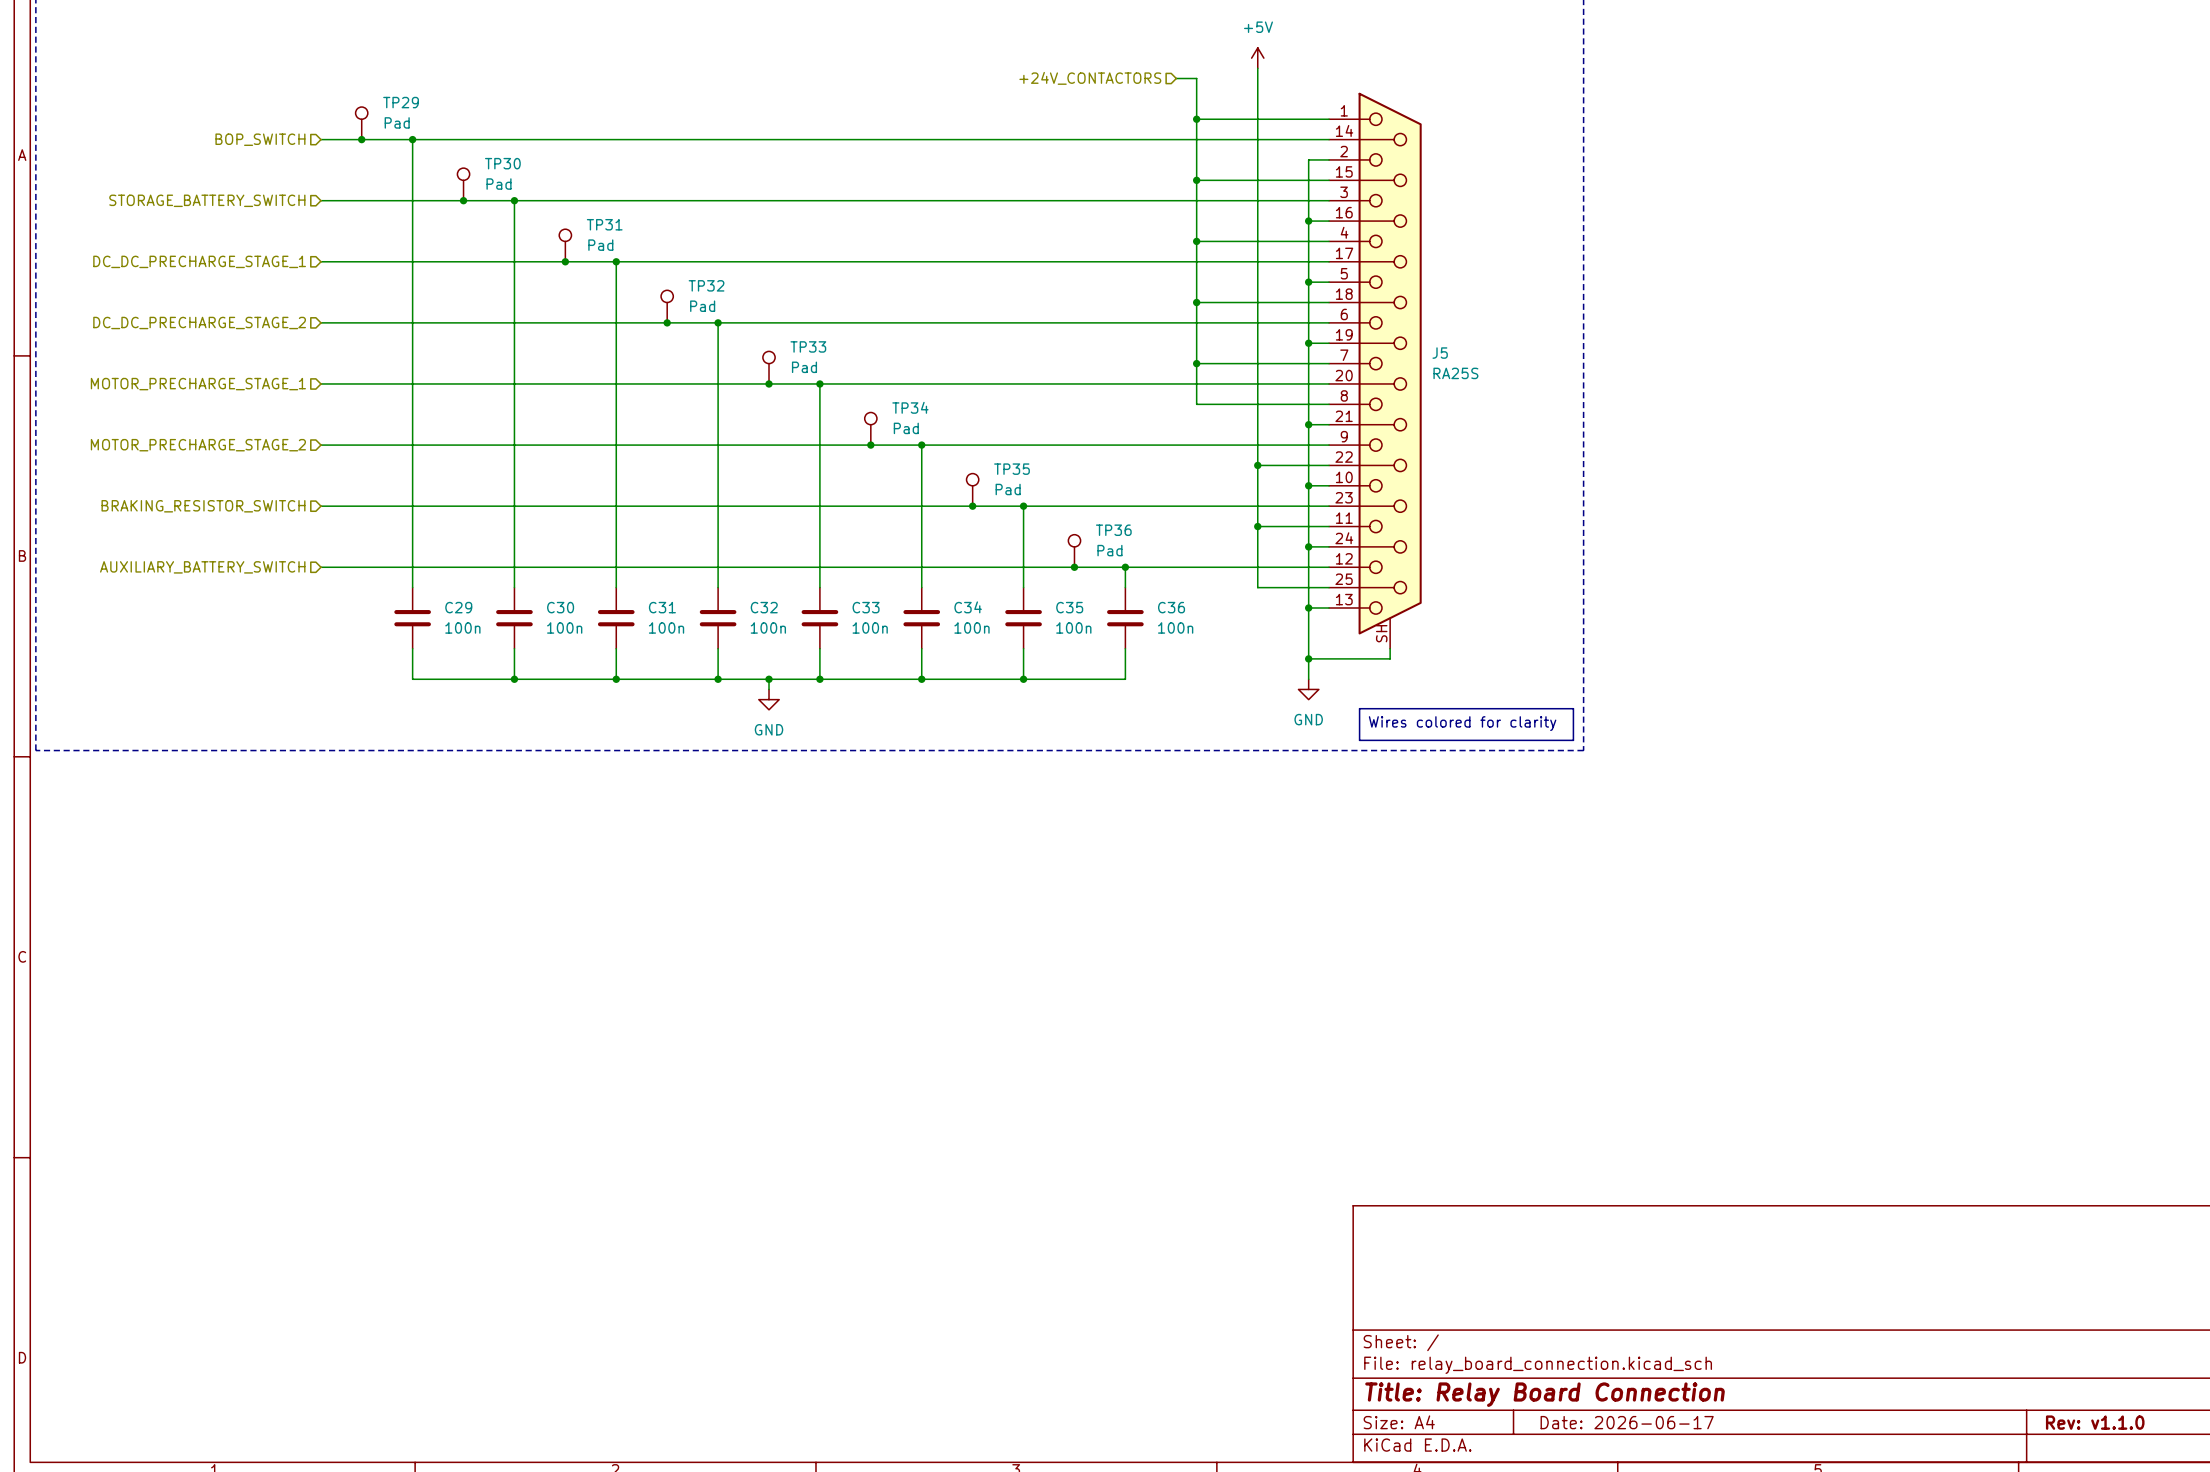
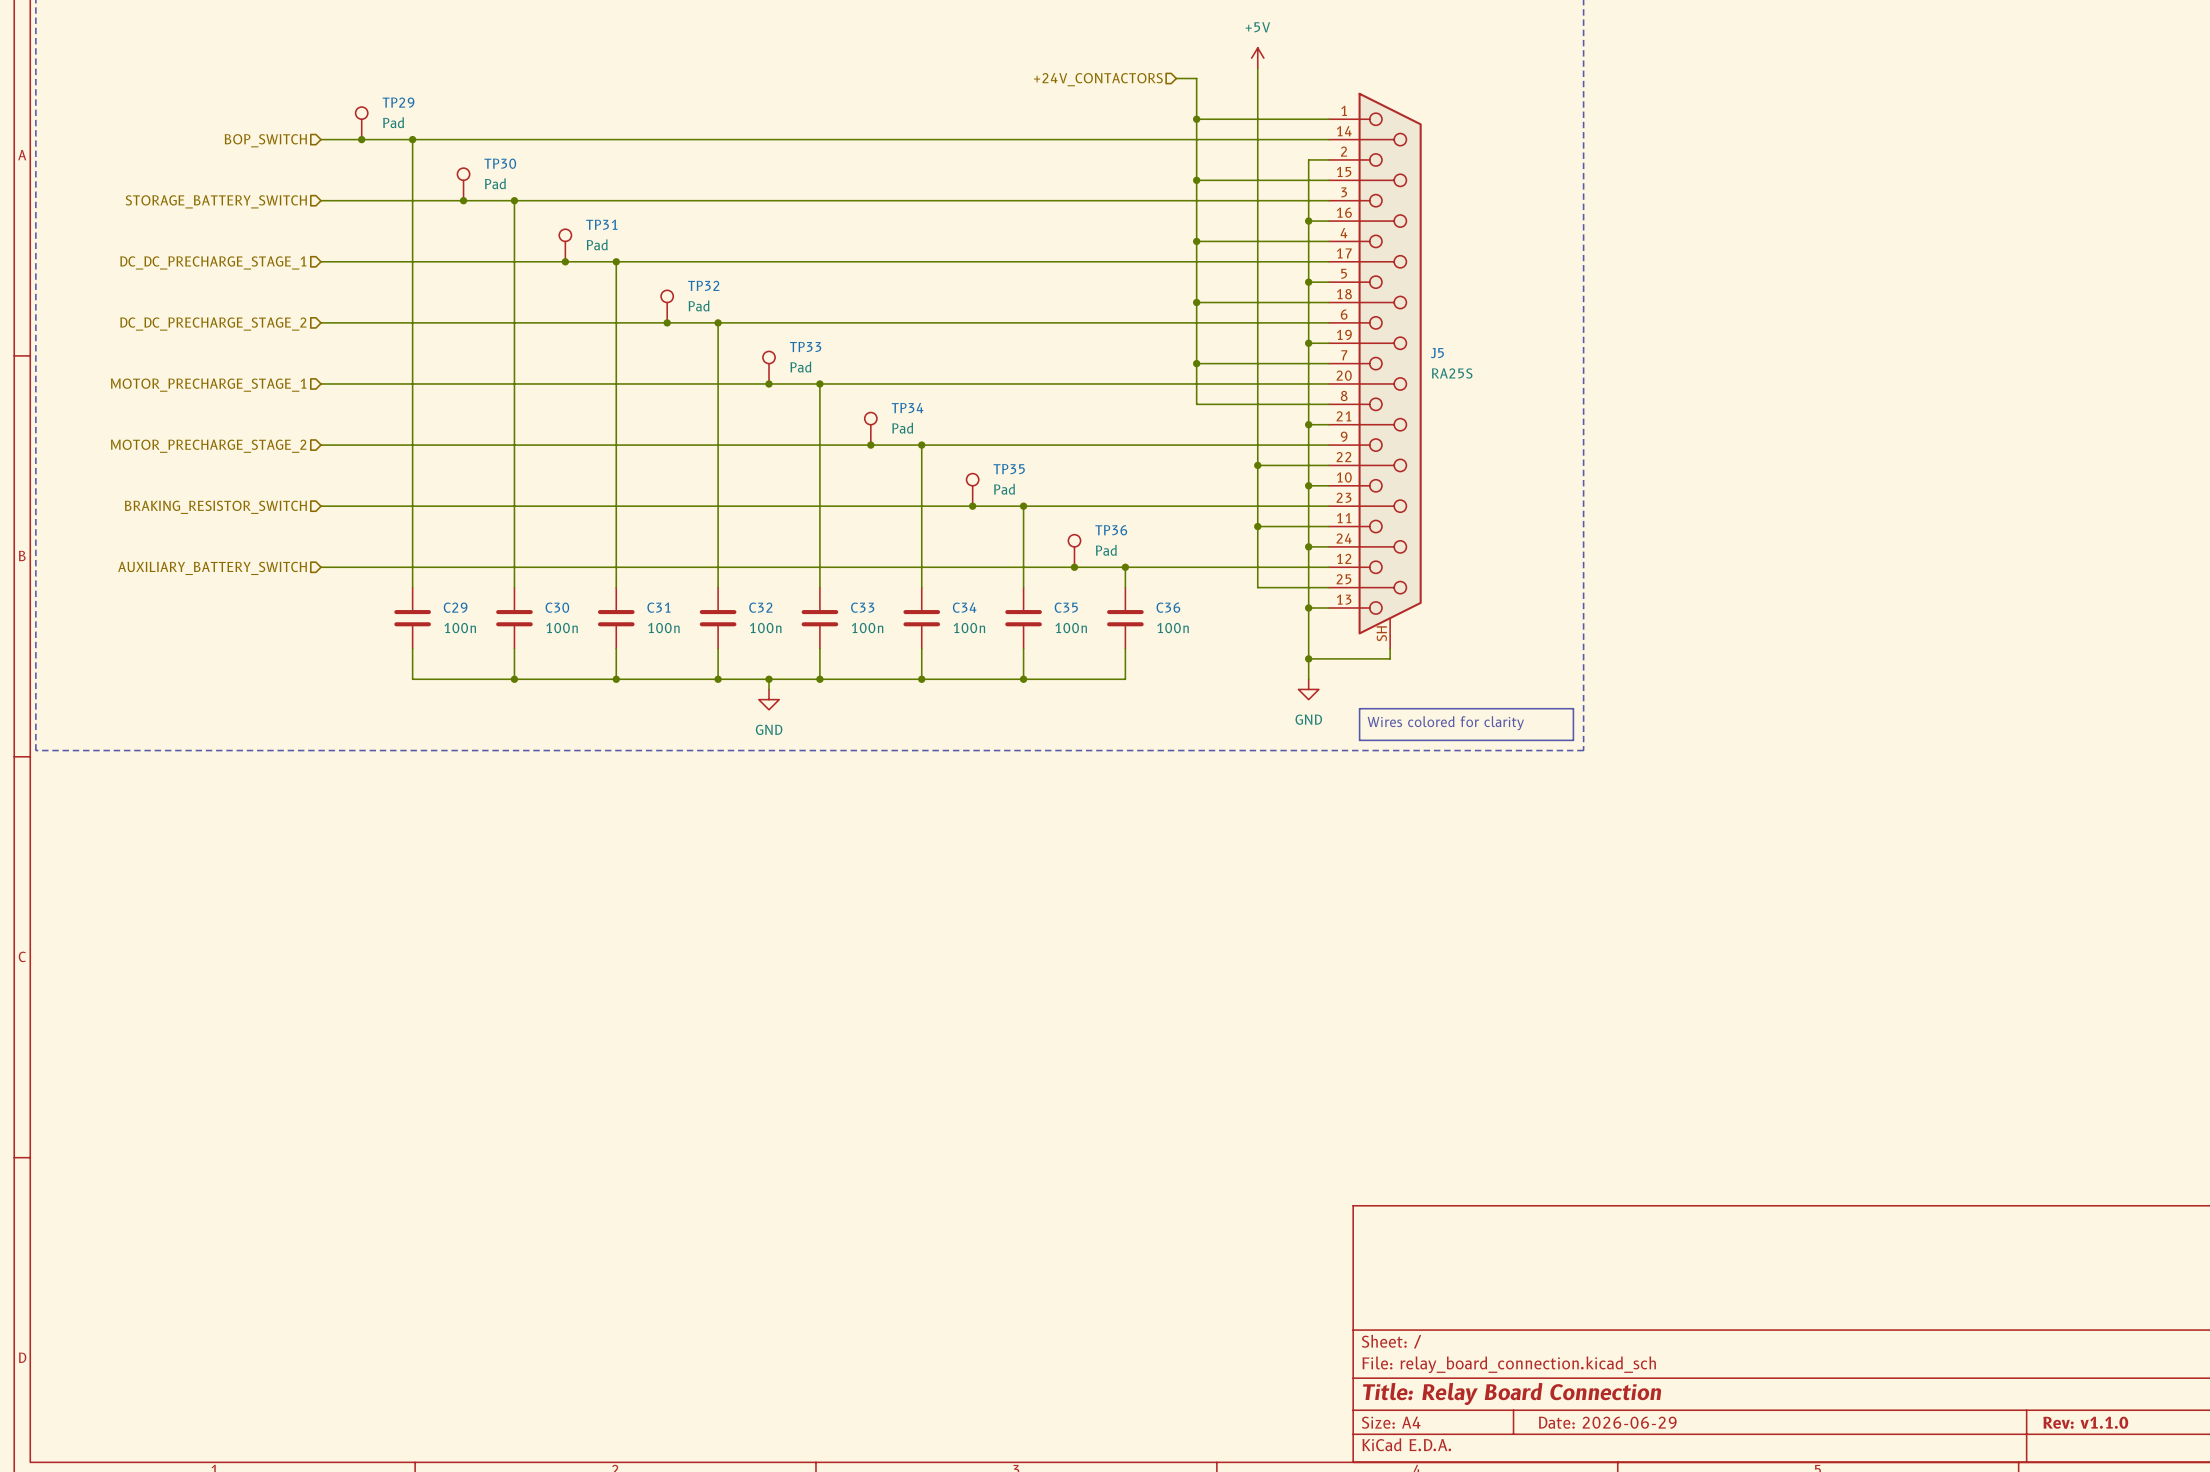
title block: Date: 2026-06-17 (1627, 1422) -> Date: 2026-06-29 (1607, 1422)

